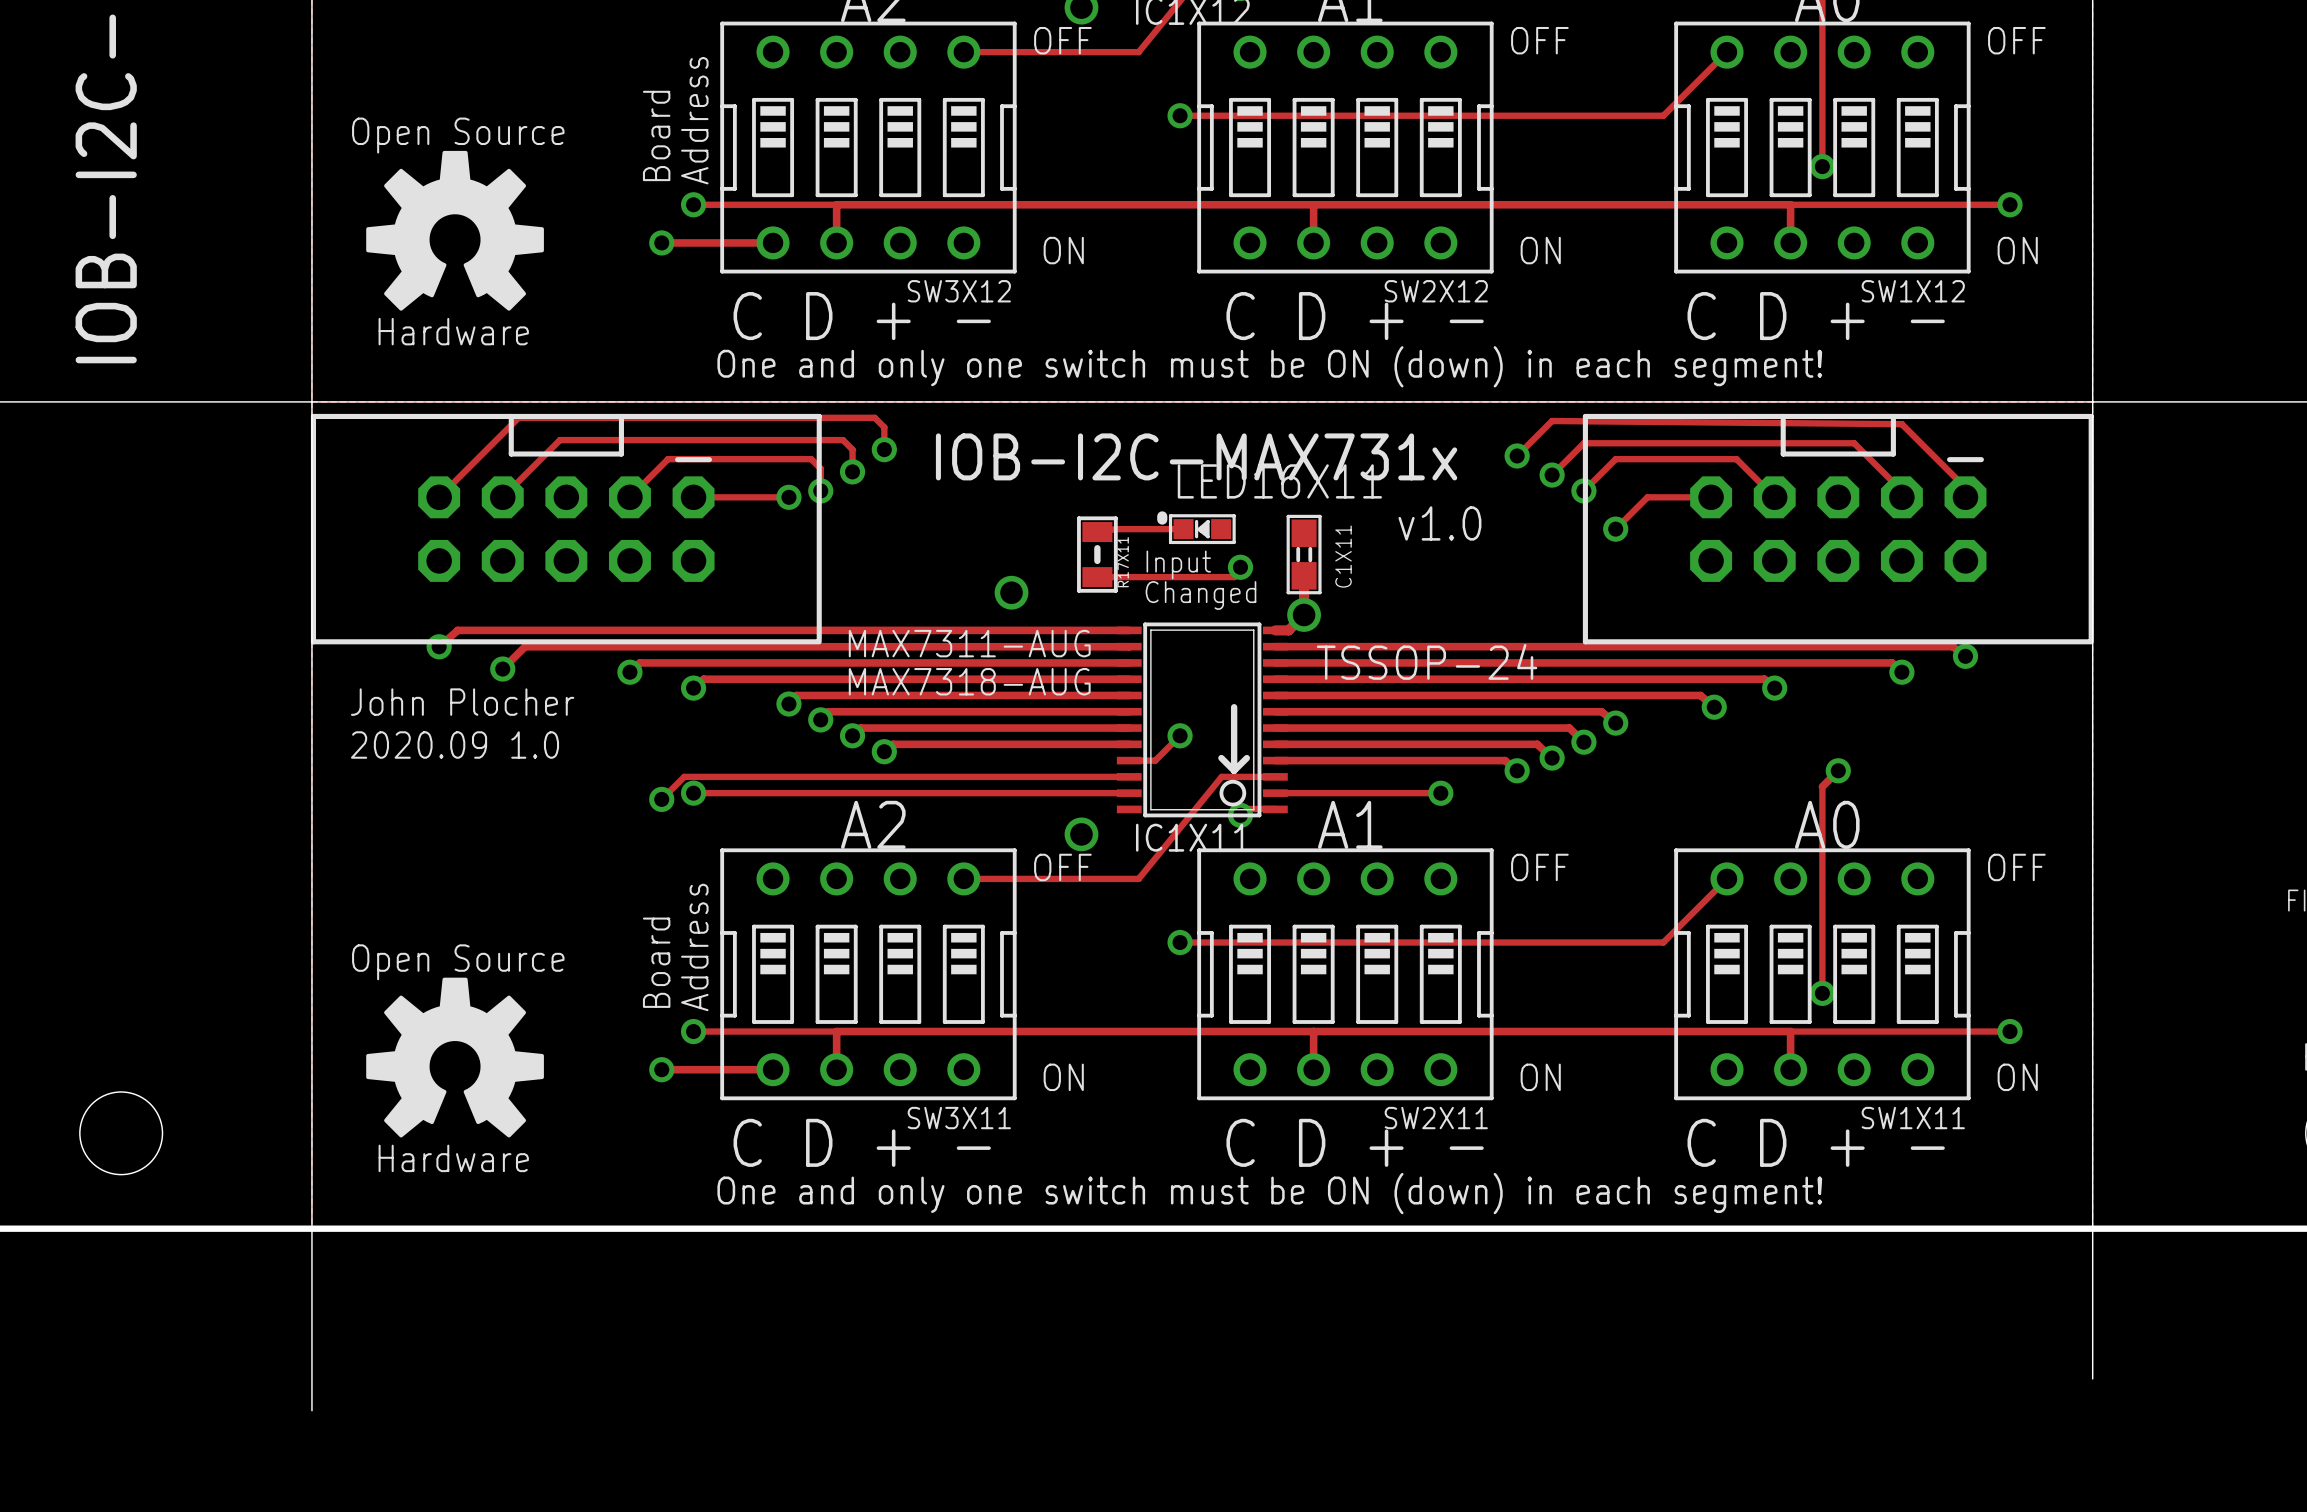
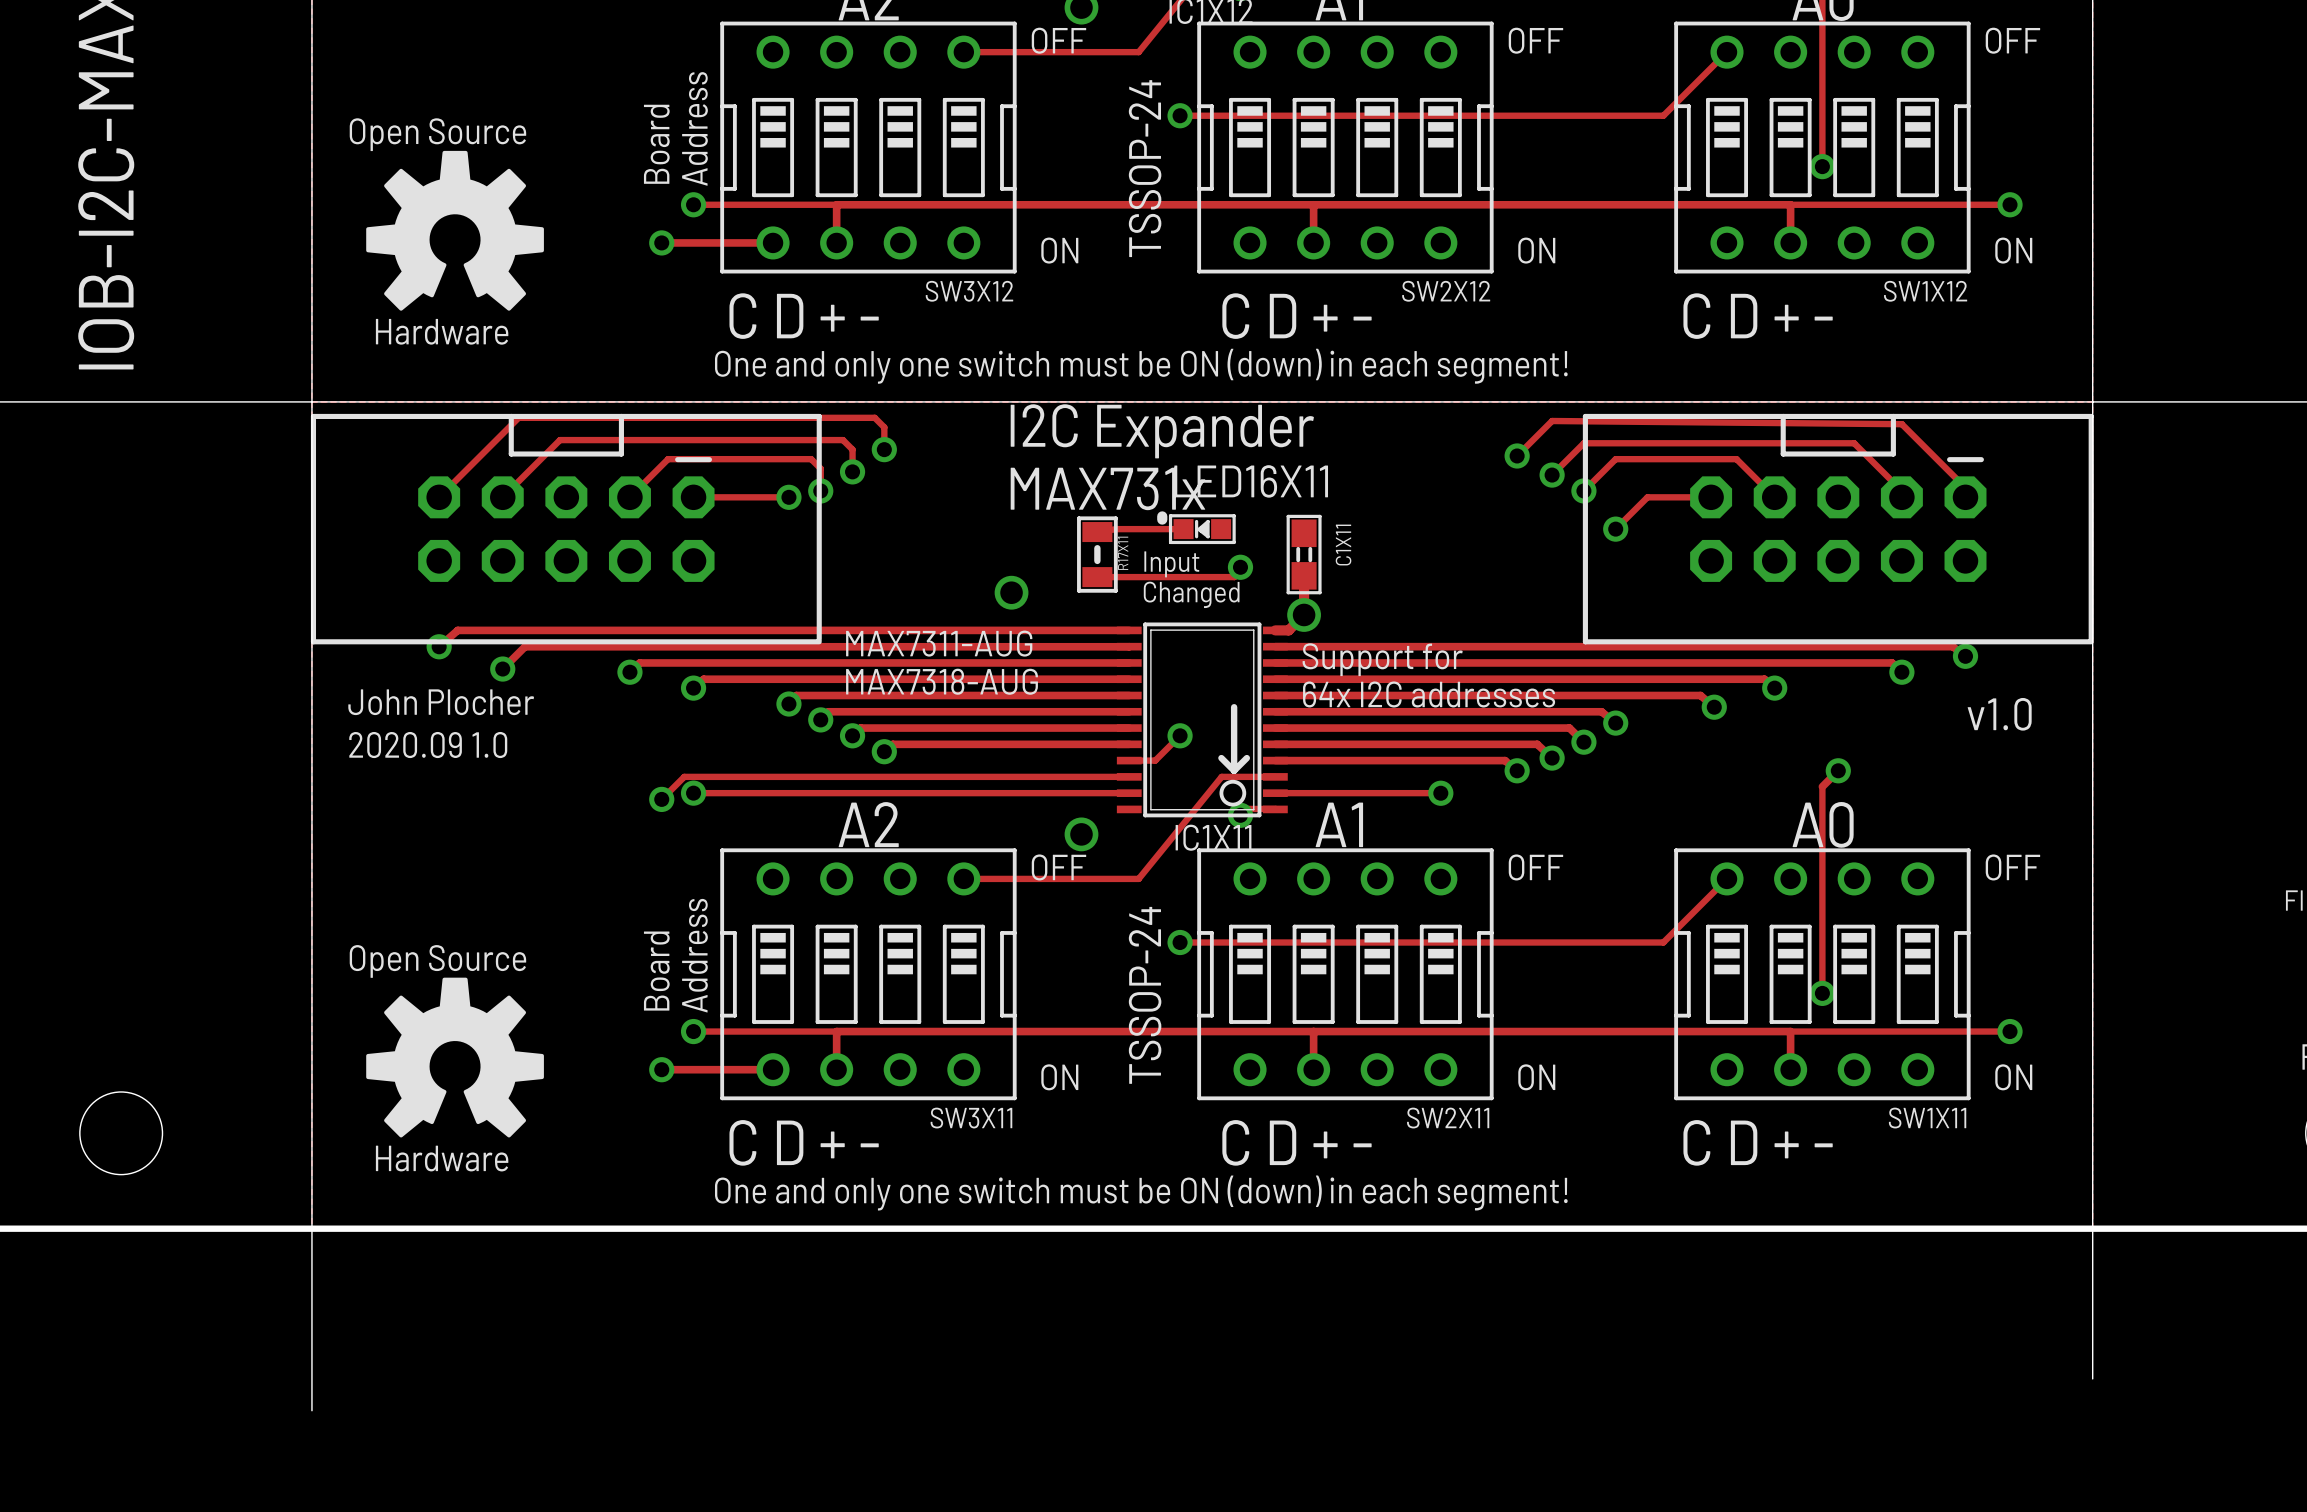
text: none -> TSSOP-24 (1145, 168)
text: none -> I2C Expander (1162, 431)
text: IOB-I2C-MAX731x (1196, 456) -> MAX731x (1107, 488)
text position: v1.0 (1439, 523) -> v1.0 (1999, 714)
text: none -> Support for (1382, 659)
text: TSSOP-24 (1427, 661) -> none
text: none -> 64x I2C addresses (1429, 694)
text: none -> TSSOP-24 (1145, 995)

